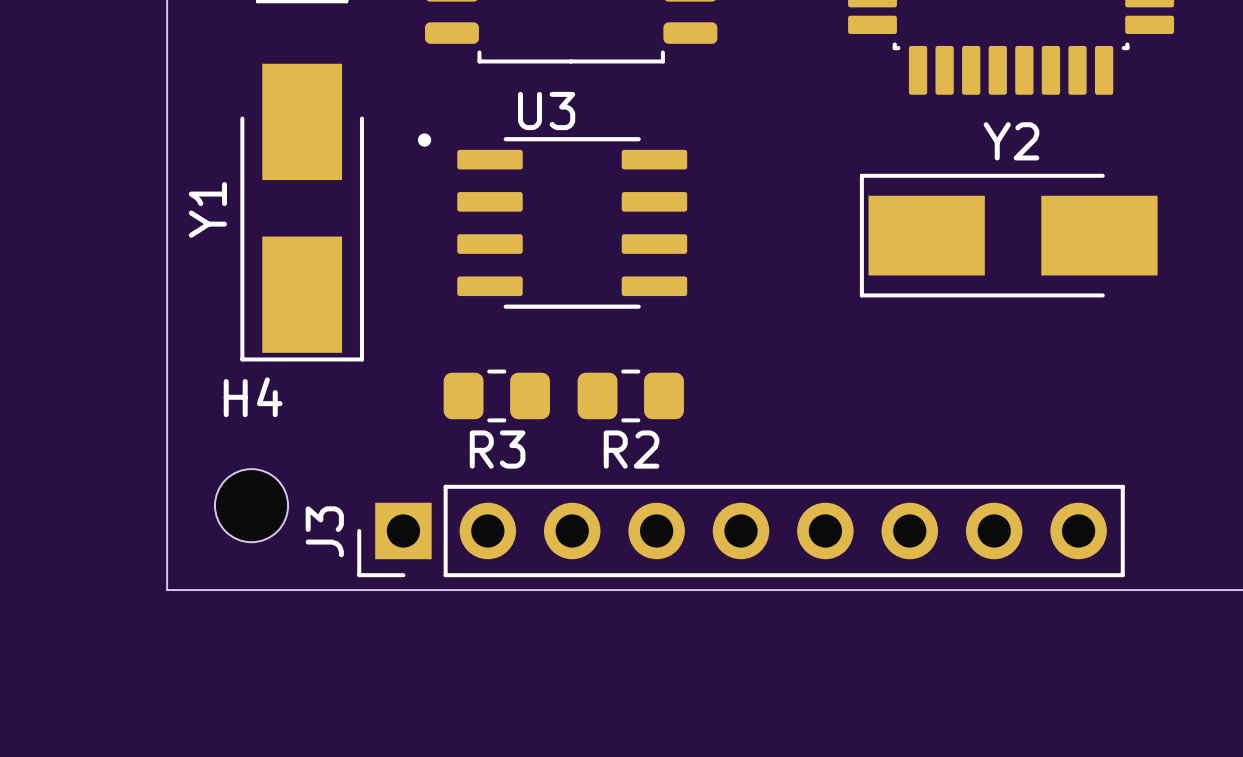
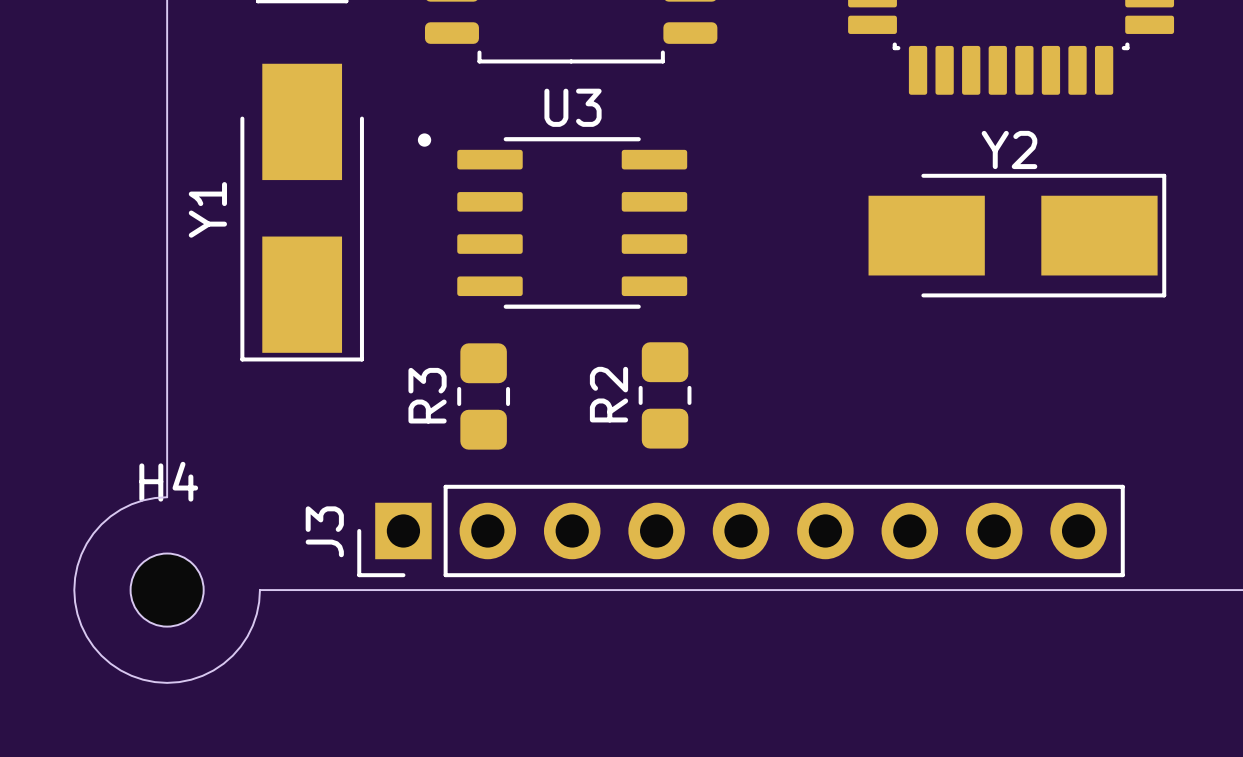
U3 name position: U3 (546, 111) -> U3 (573, 107)
Y2 rotation: 0° (1008, 235) -> 180° (1017, 235)
R3 rotation: 0° (496, 395) -> 90° clockwise (483, 396)
R2 rotation: 0° (630, 395) -> 90° clockwise (665, 395)
board edge: (167, 497) (167, 590) (259, 590) -> (167, 497) (143, 500) (131, 504) (110, 516) (93, 533) (81, 554) (75, 577) (75, 602) (81, 625) (93, 646) (101, 655) (120, 670) (131, 675) (155, 682) (179, 682) (202, 675) (223, 663) (240, 646) (252, 625) (256, 614) (259, 590)
H4 position: (251, 505) -> (167, 590)

